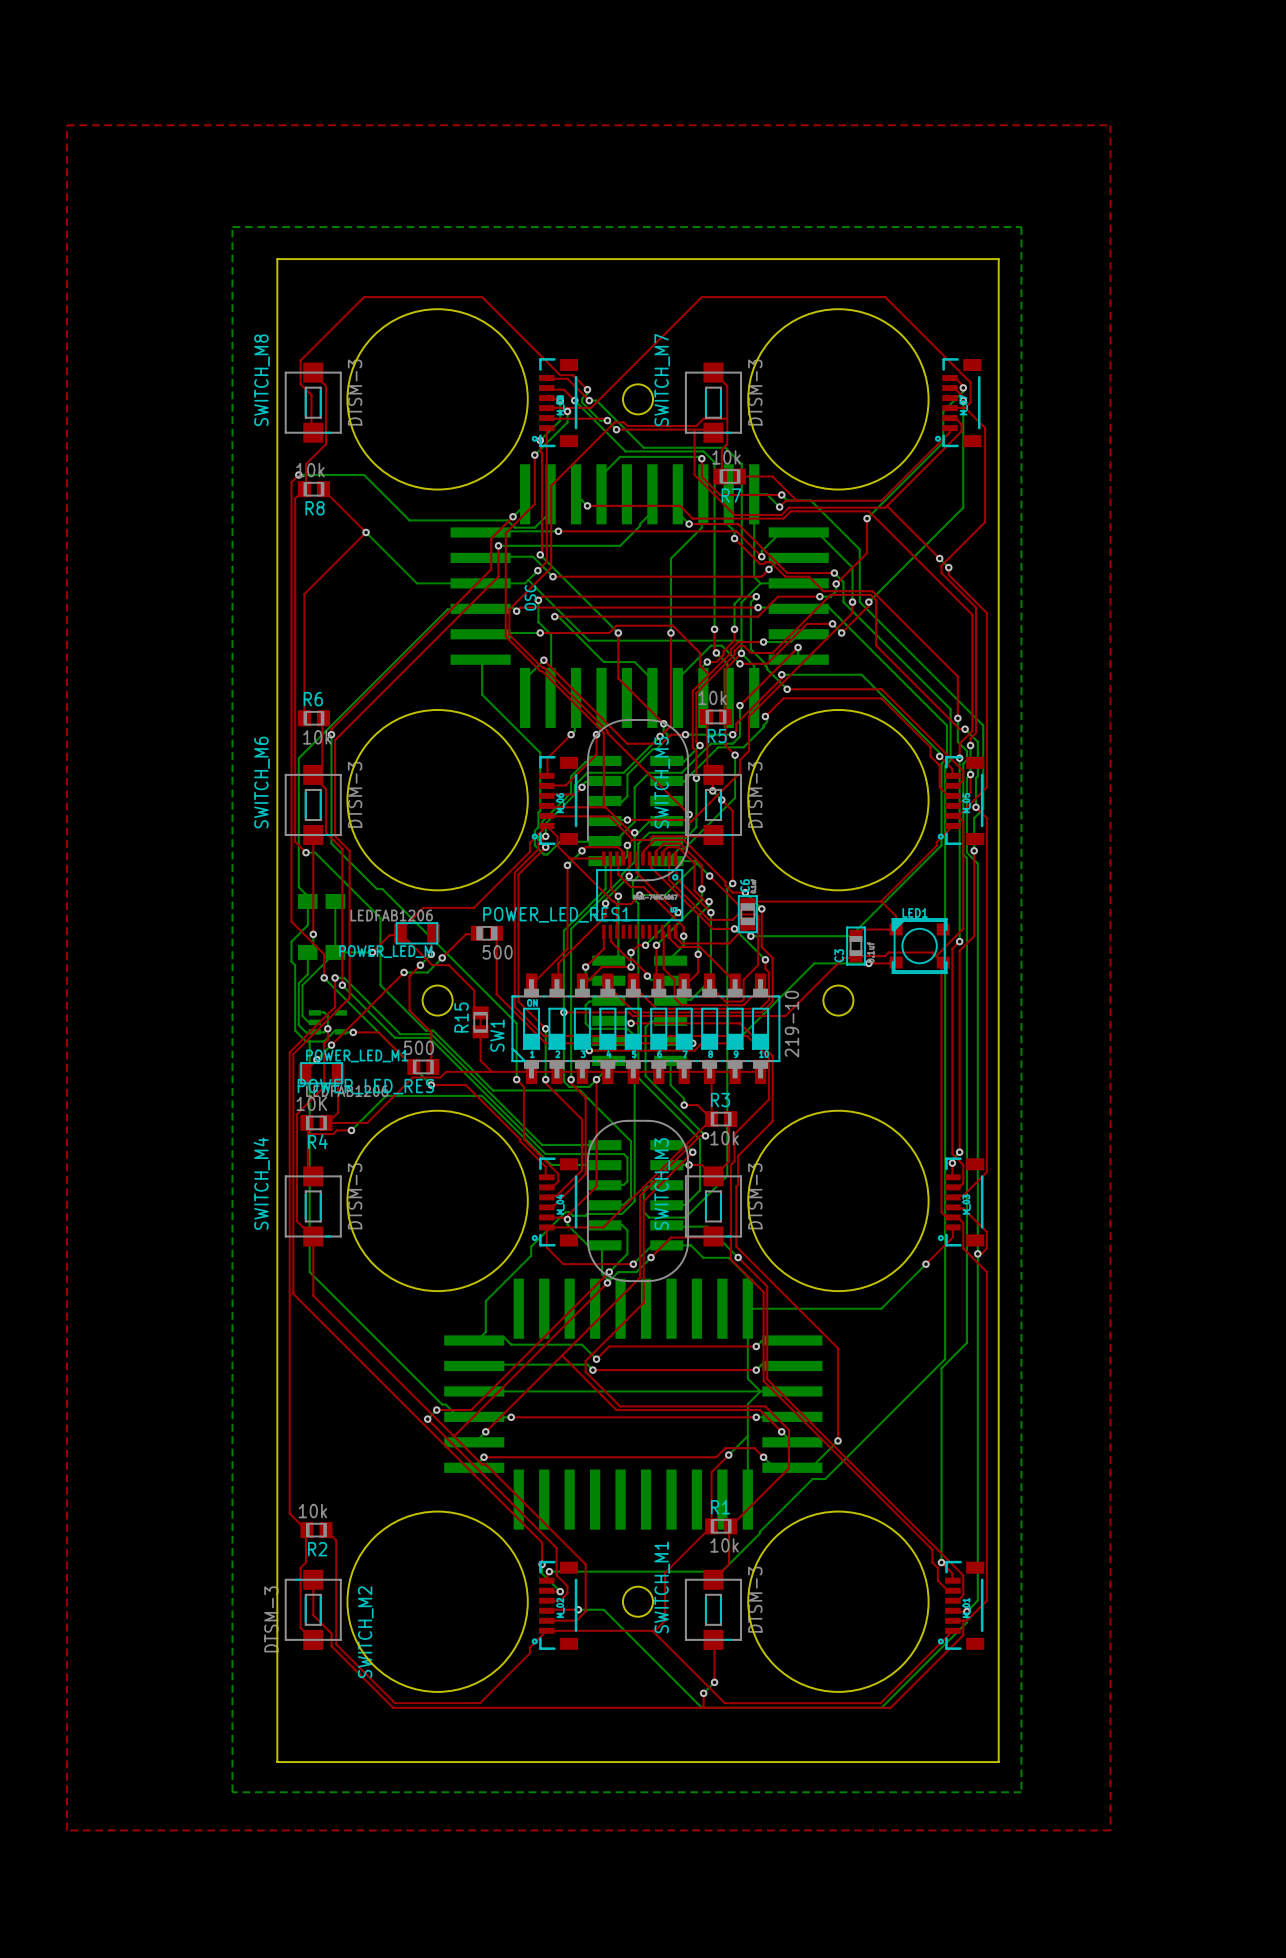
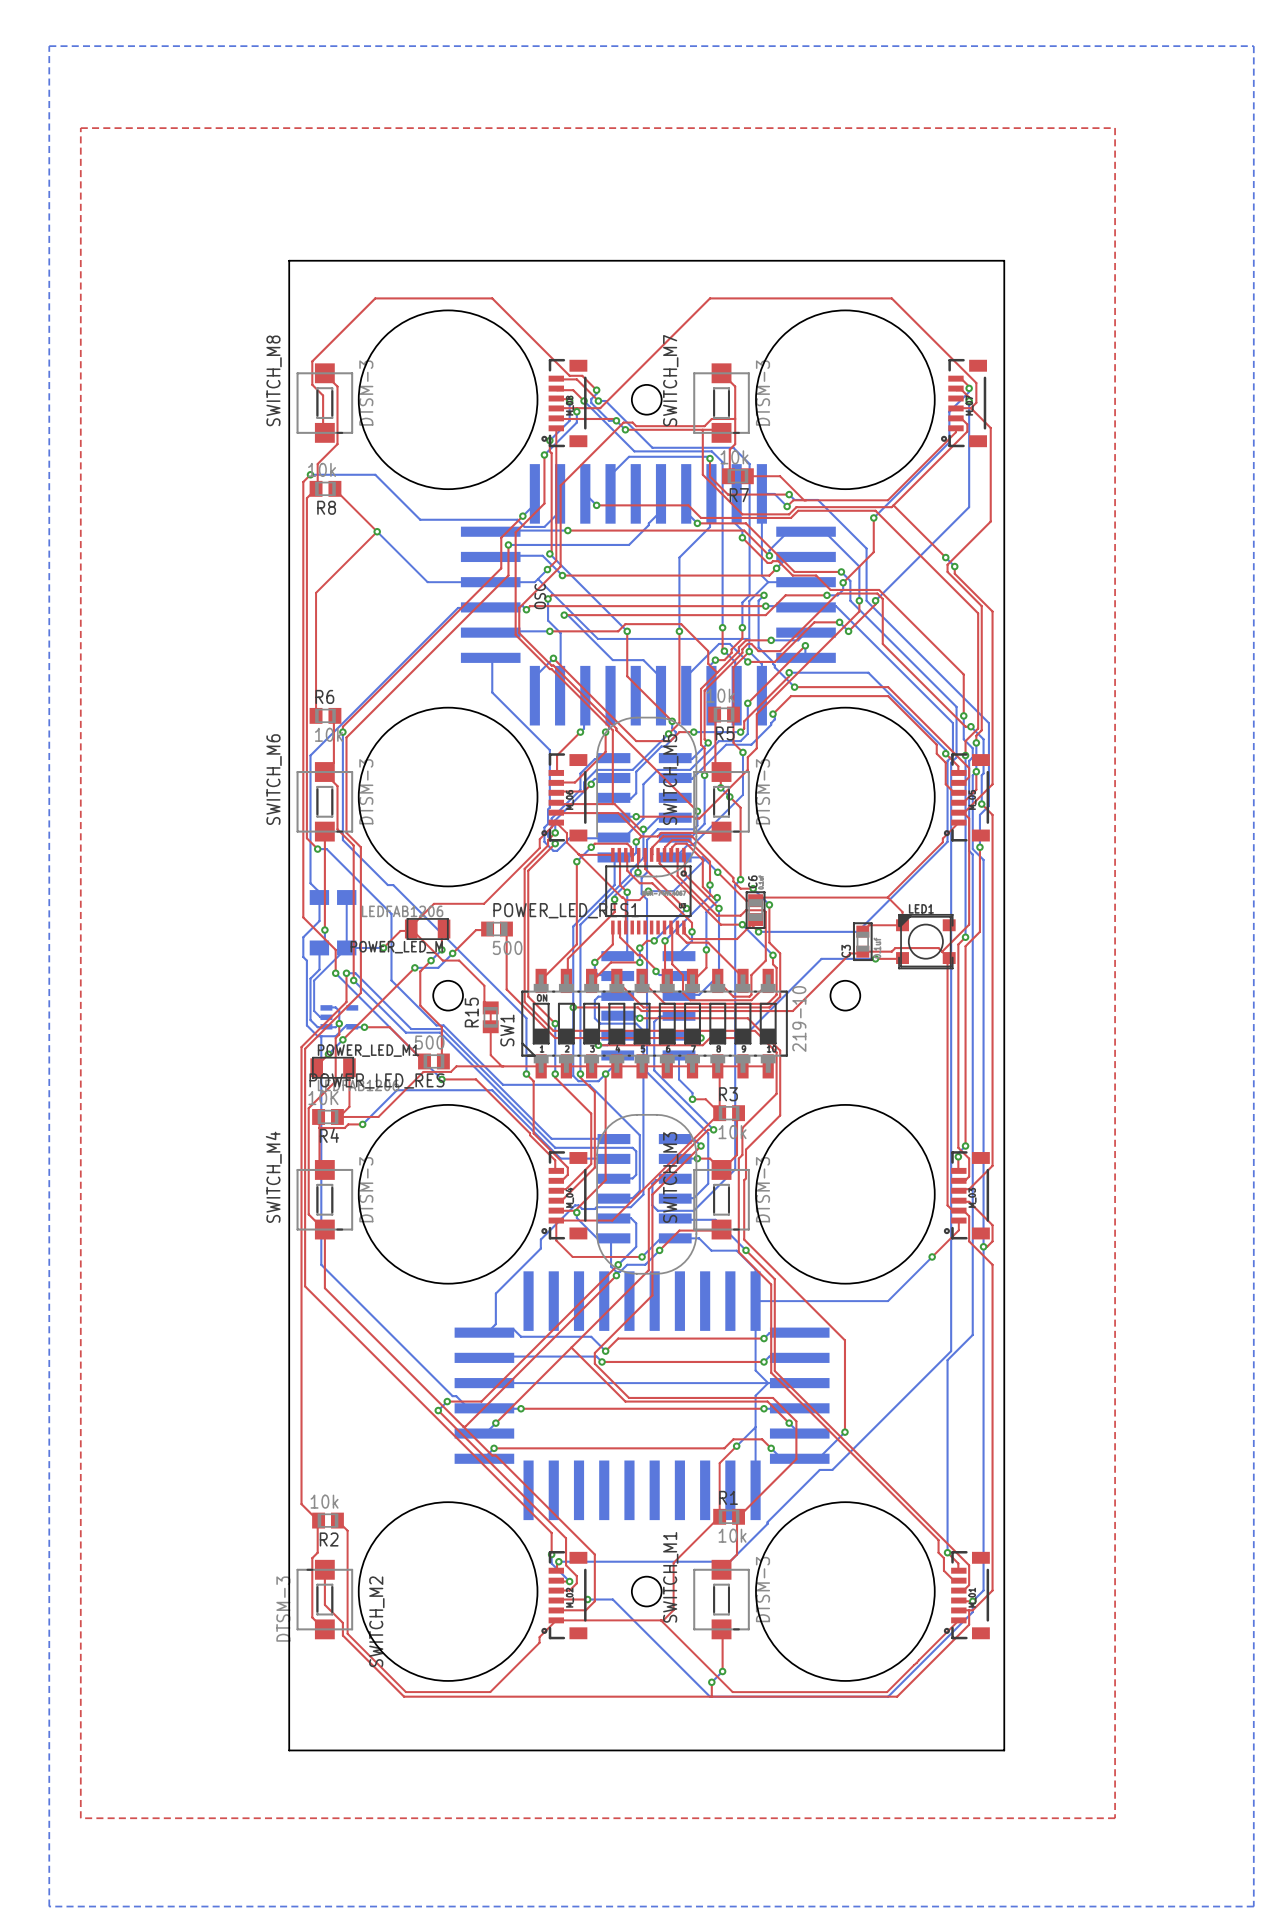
bottom zone outline: (232, 227) (1021, 227) (1021, 1792) (232, 1792) (232, 227) -> (49, 46) (49, 1906) (1253, 1906) (1253, 46) (49, 46)

